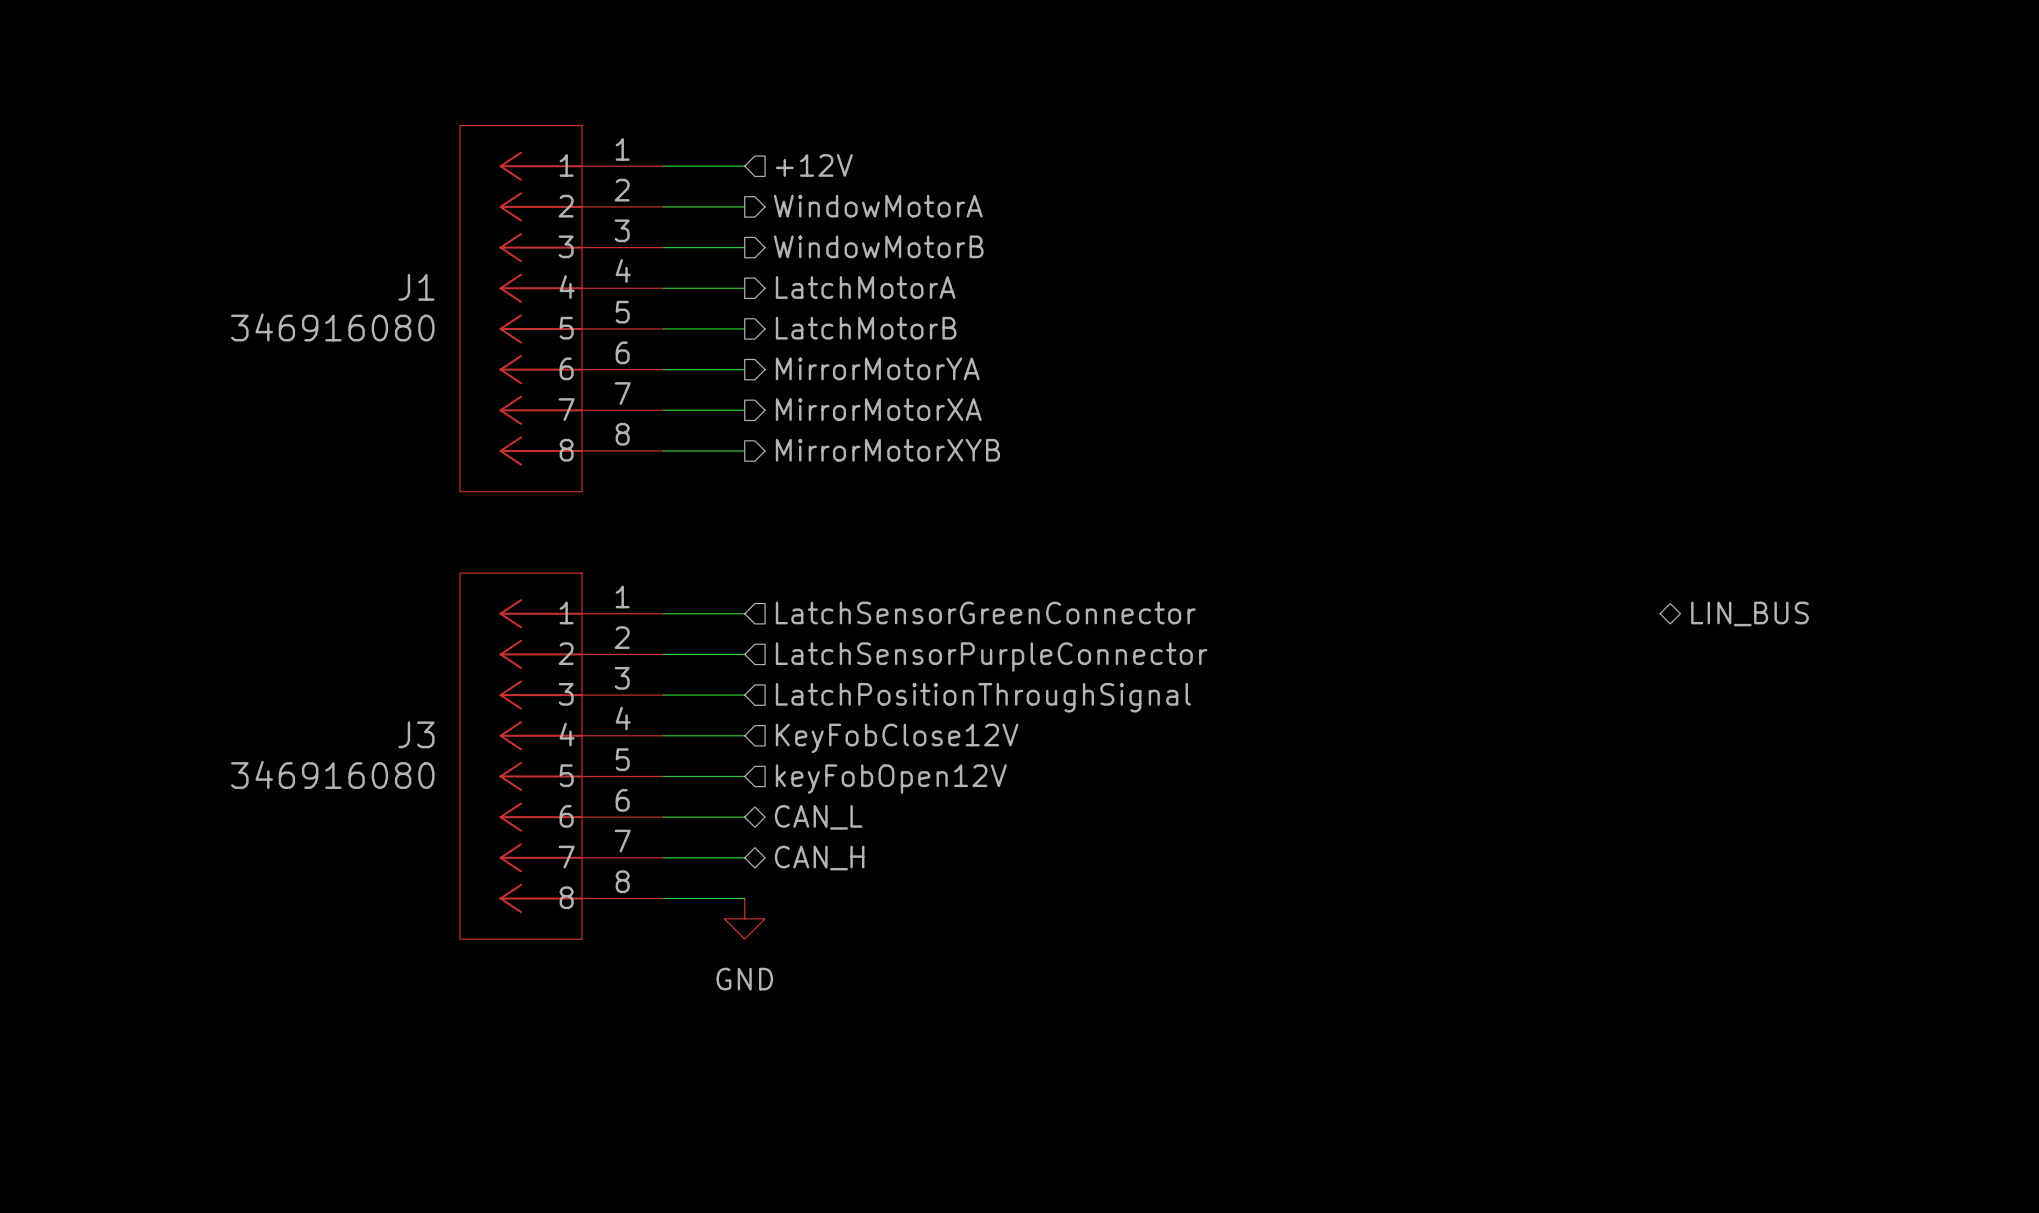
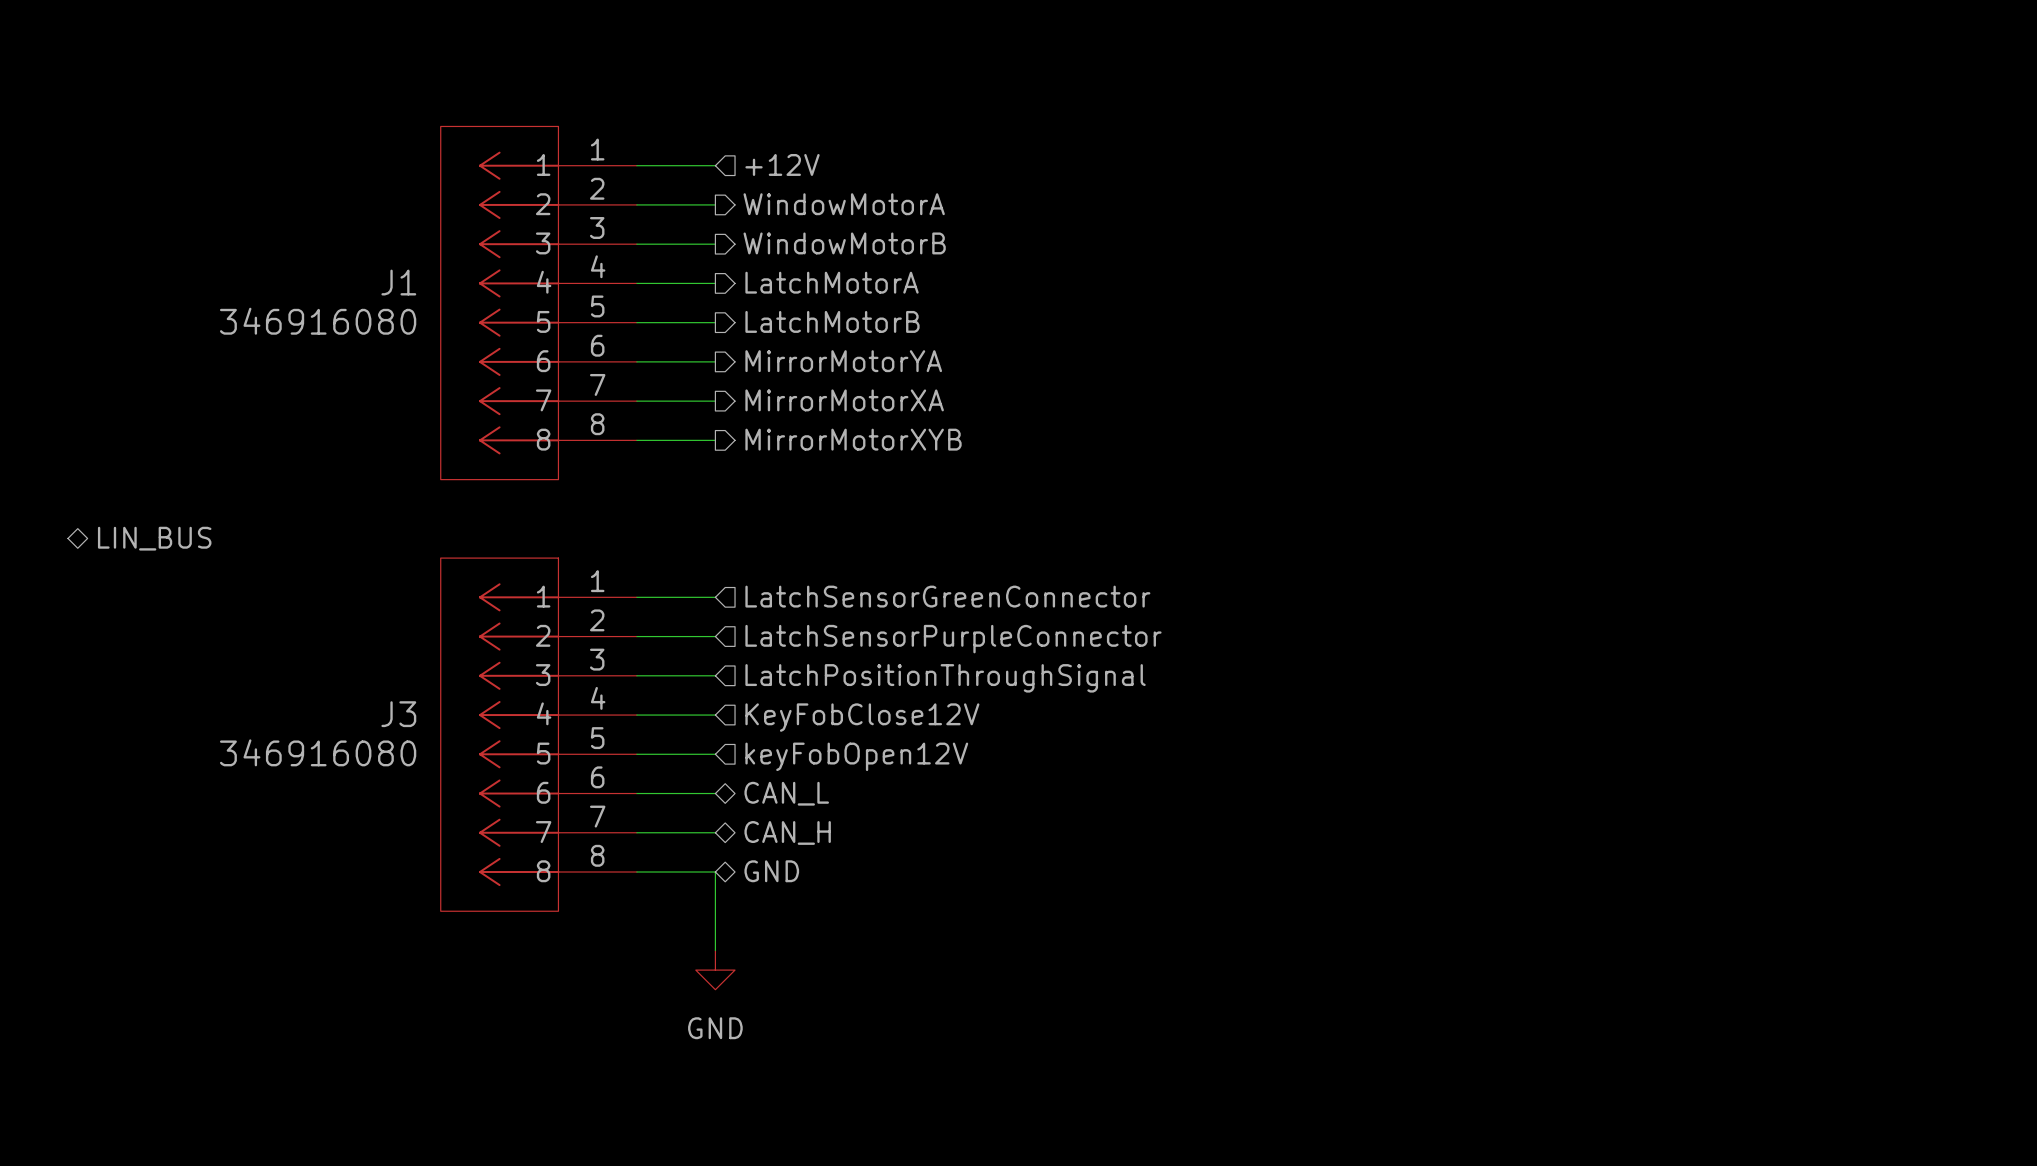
hierarchical label: none -> LIN_BUS (154, 538)
hierarchical label: LIN_BUS (1749, 613) -> none
hierarchical label: none -> GND (771, 871)
wire: none -> (715, 872) (715, 950)
power symbol position: GND (744, 918) -> GND (715, 970)

